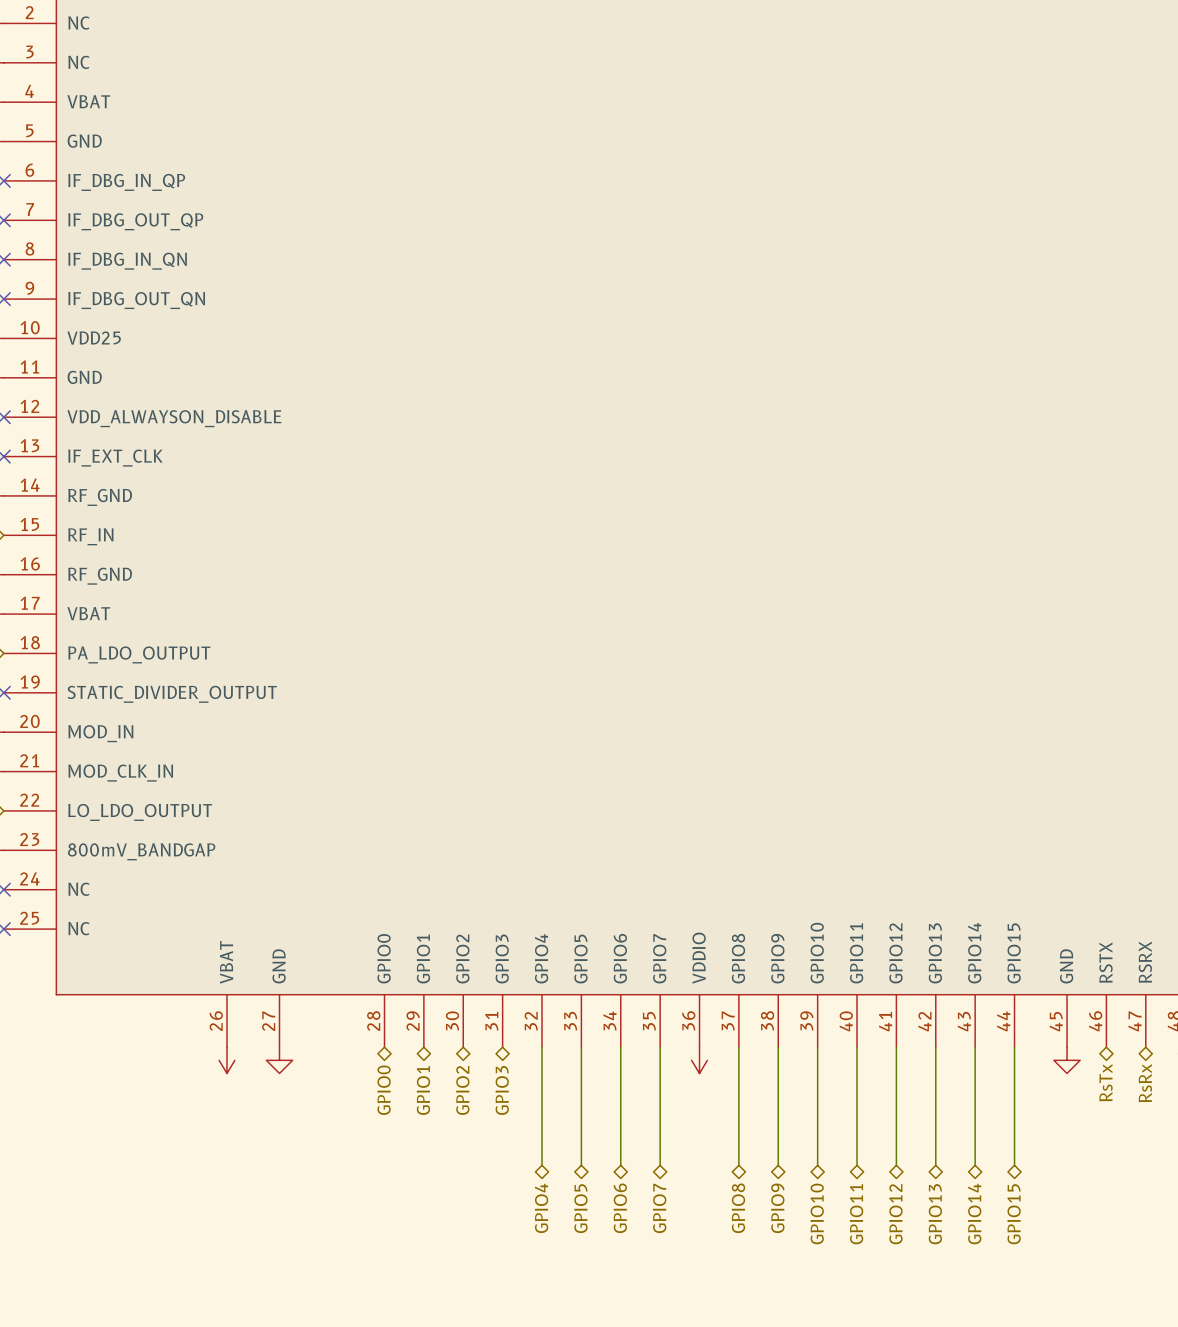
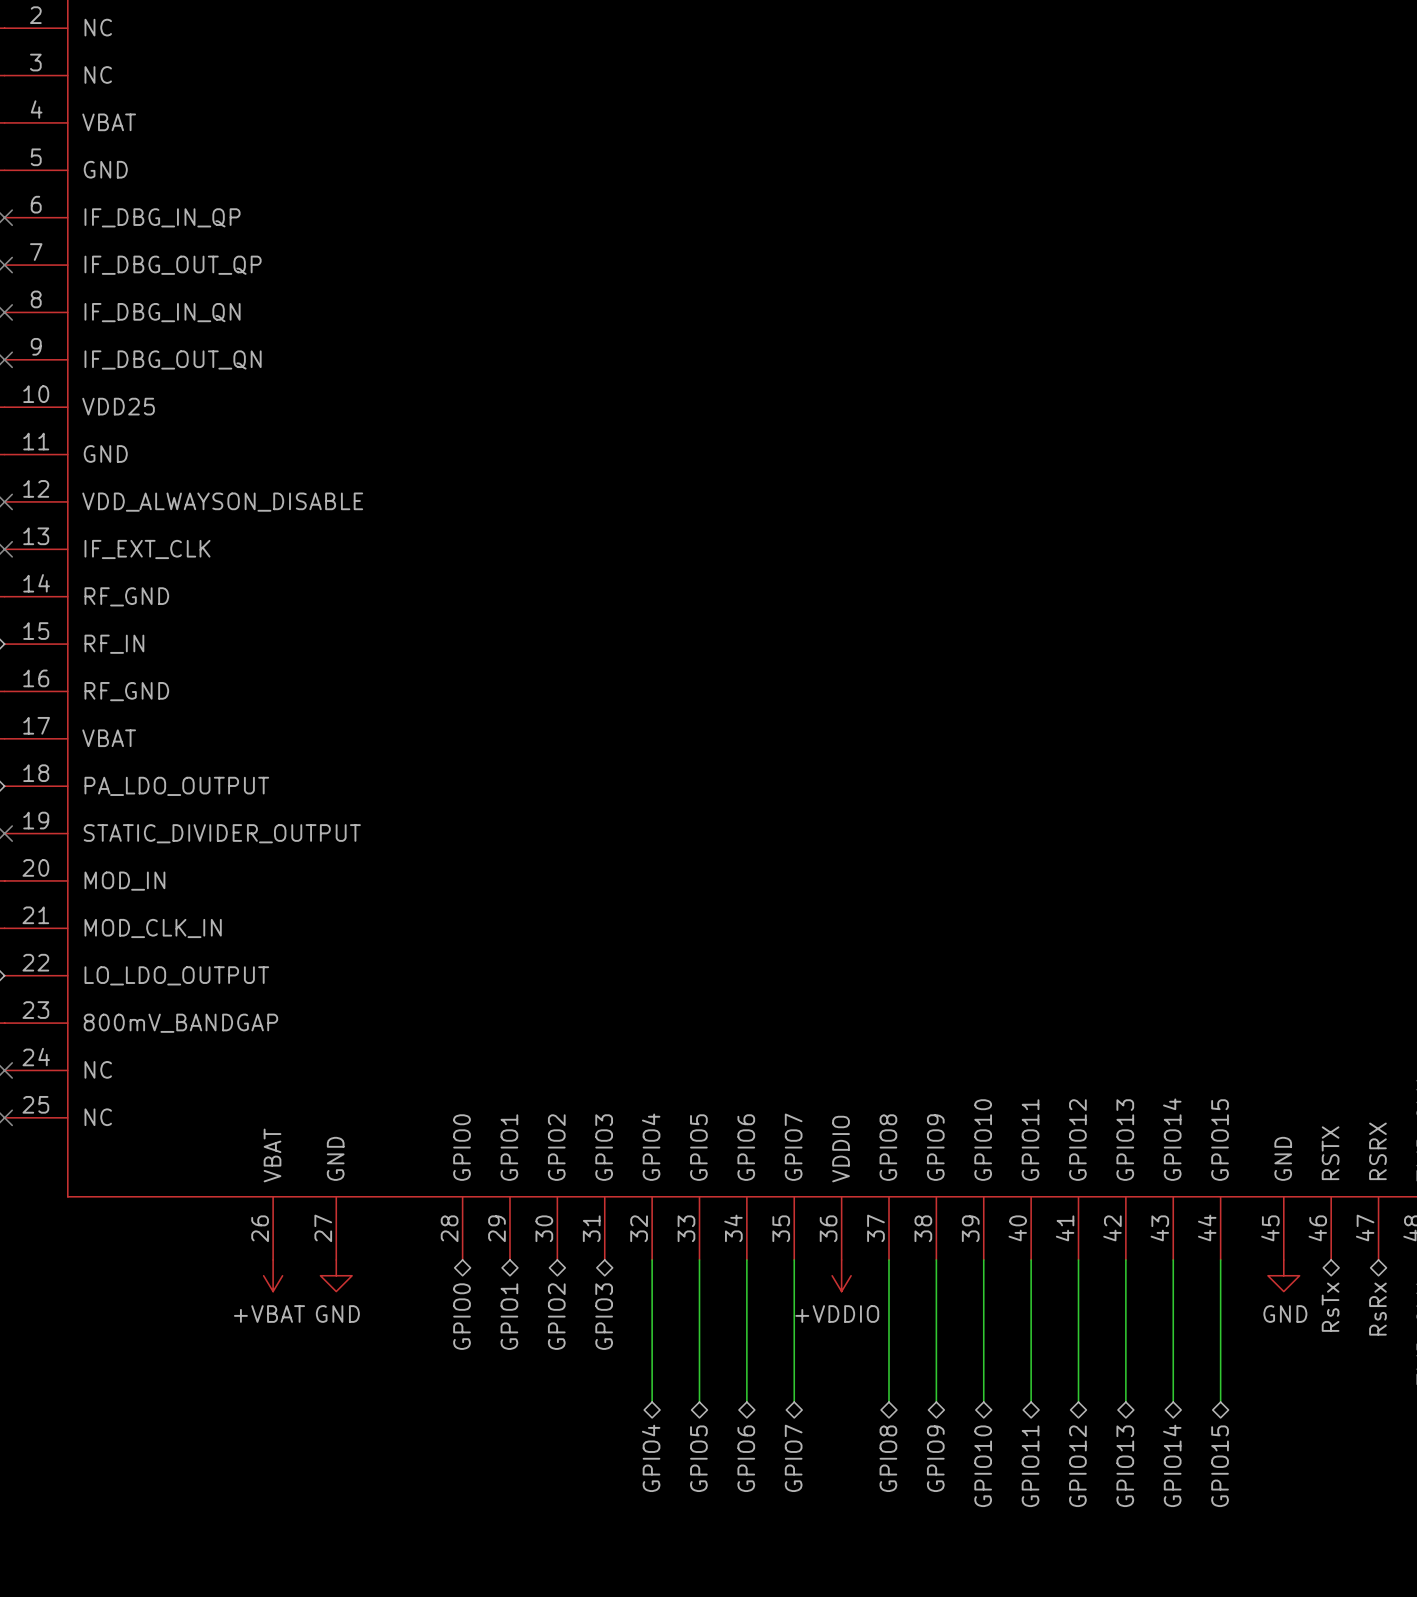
power symbol text: none -> +VBAT (269, 1314)
power symbol text: none -> GND (337, 1314)
power symbol text: none -> +VDDIO (837, 1314)
power symbol text: none -> GND (1285, 1314)

